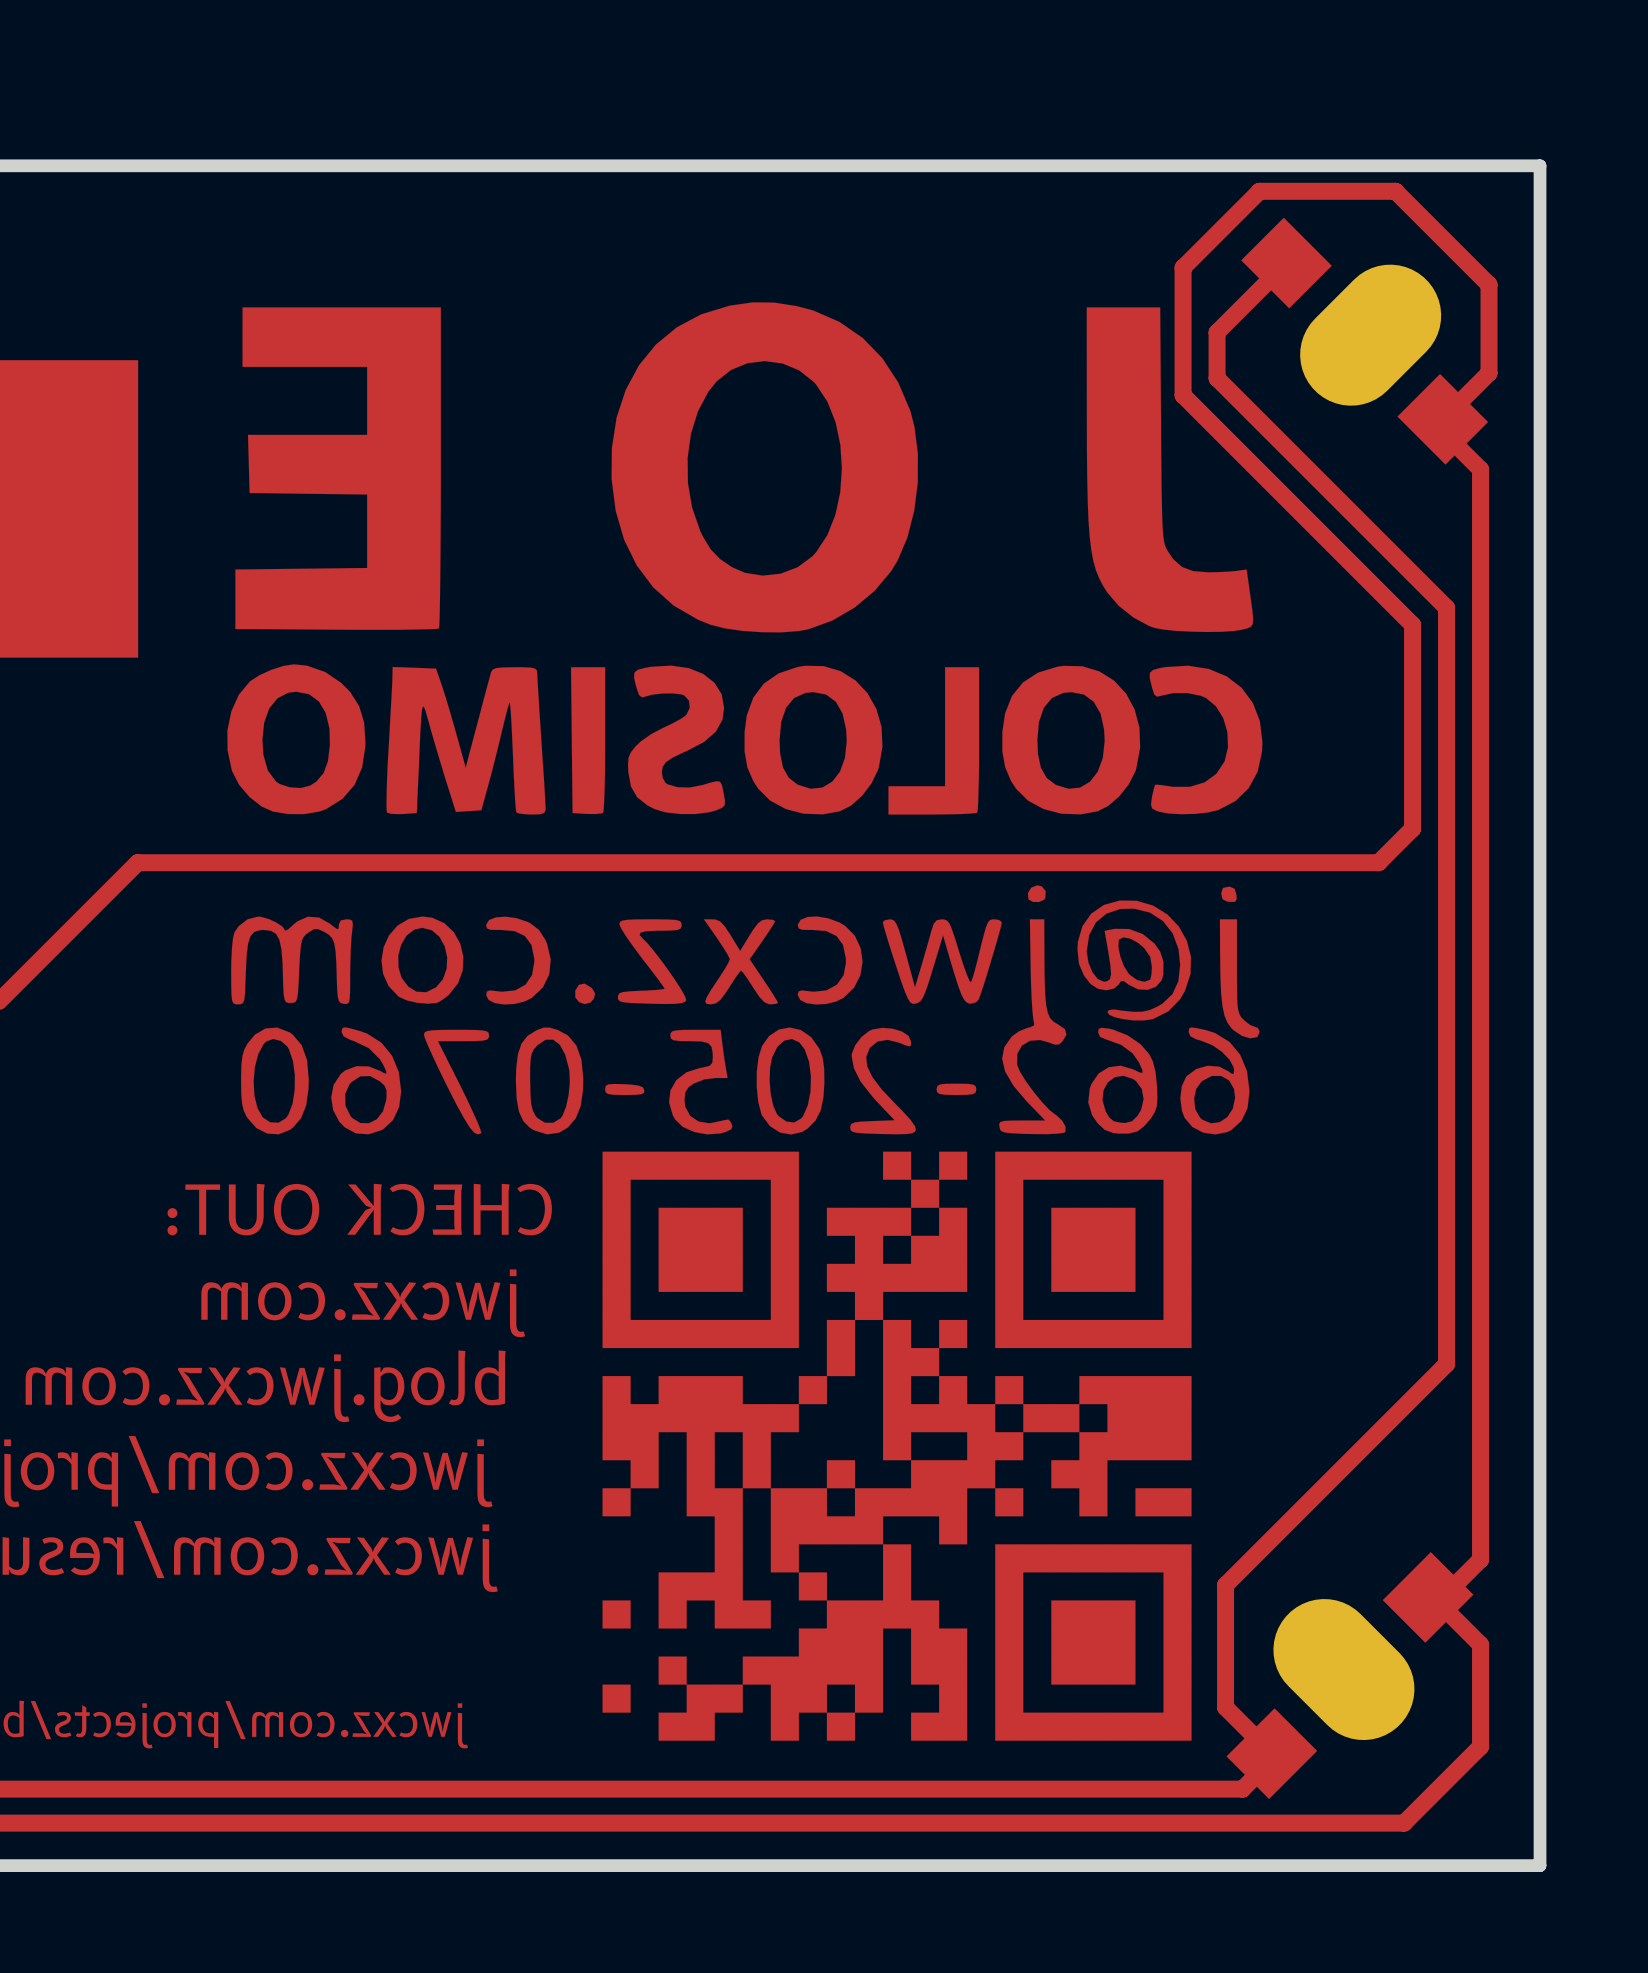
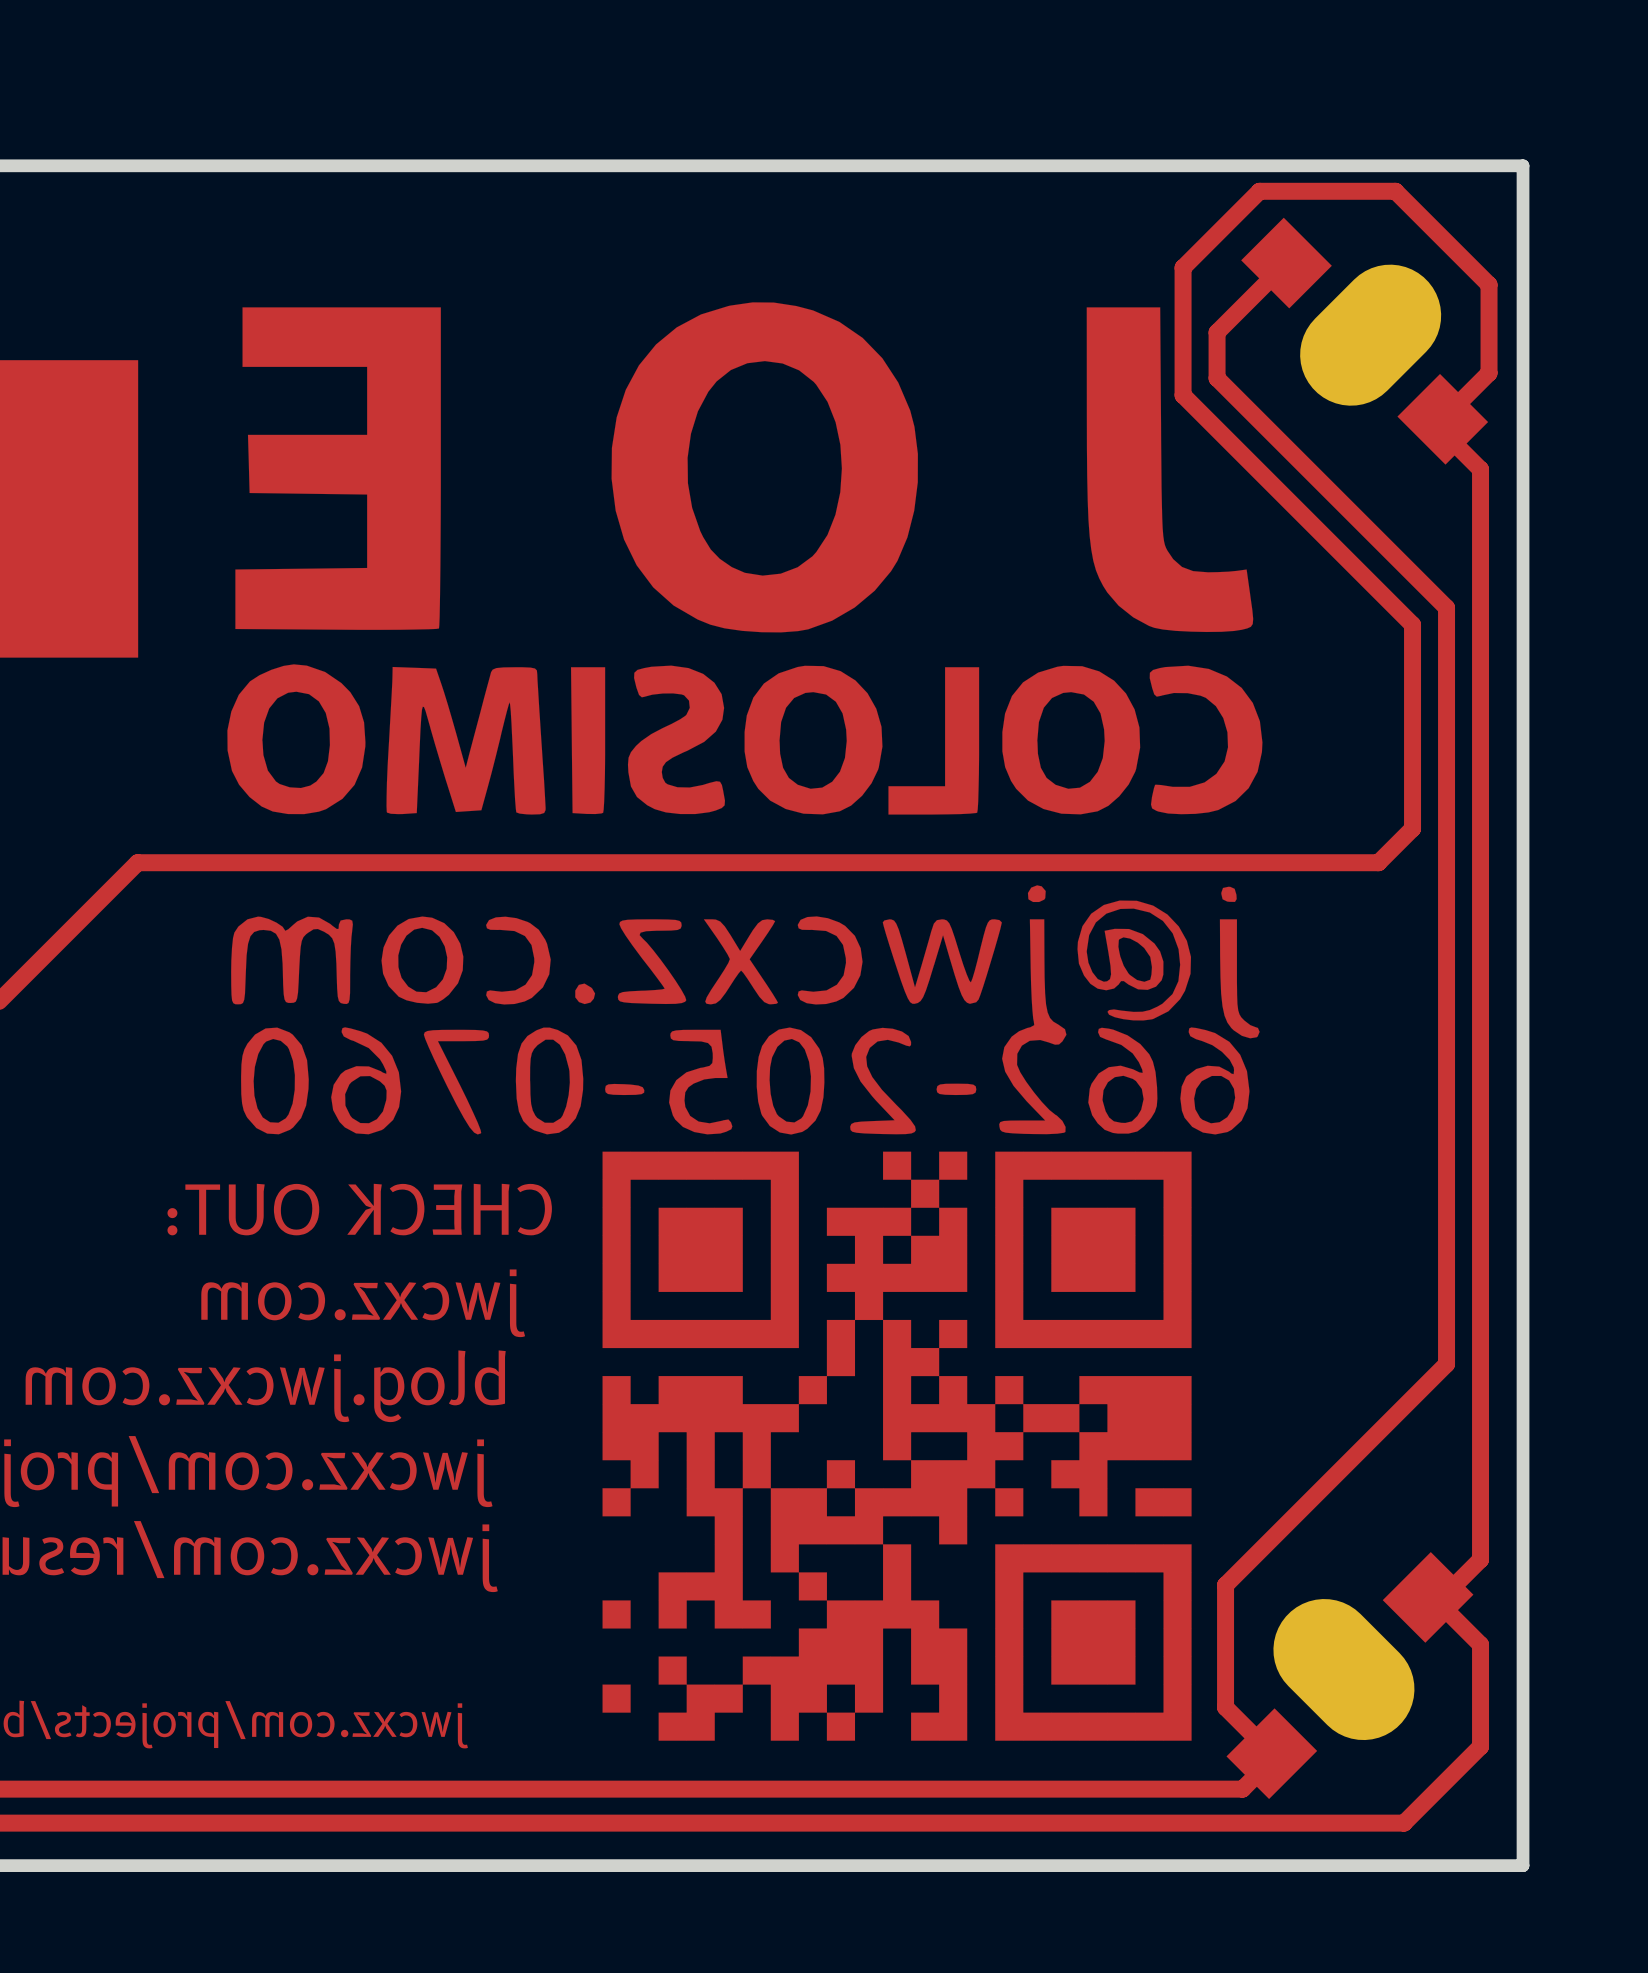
board edge: (1523, 165) (1540, 165) (1540, 1865) (1523, 1865) -> (1523, 165) (1523, 1865)

